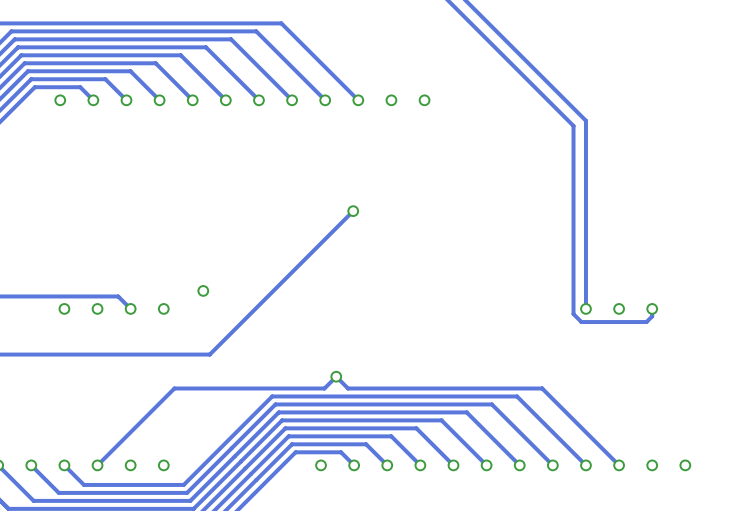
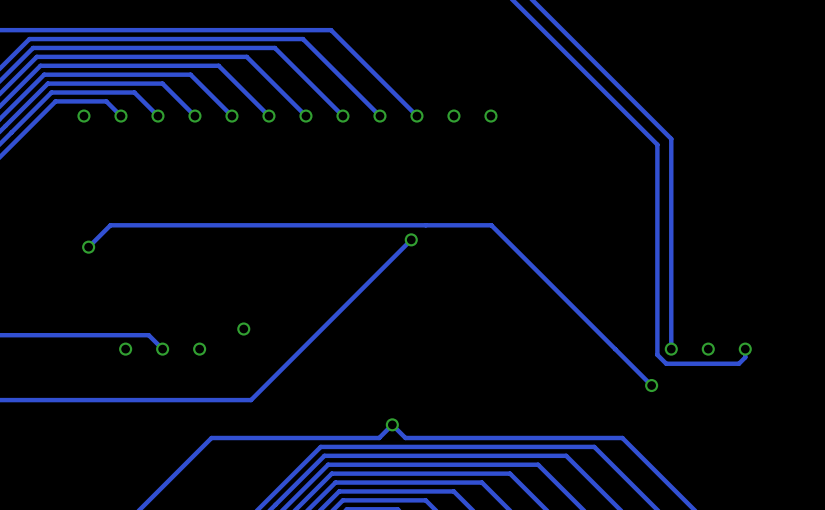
track: none -> (88, 247) (110, 225) (491, 225) (651, 385)
via position: (64, 308) -> (88, 247)
via: none -> (651, 385)

